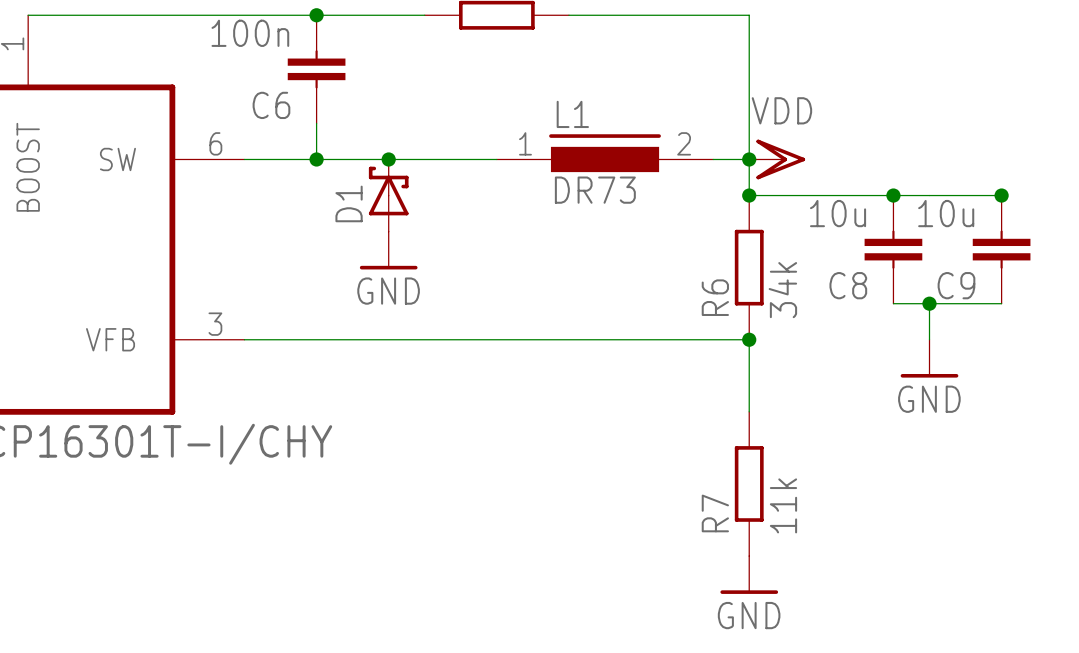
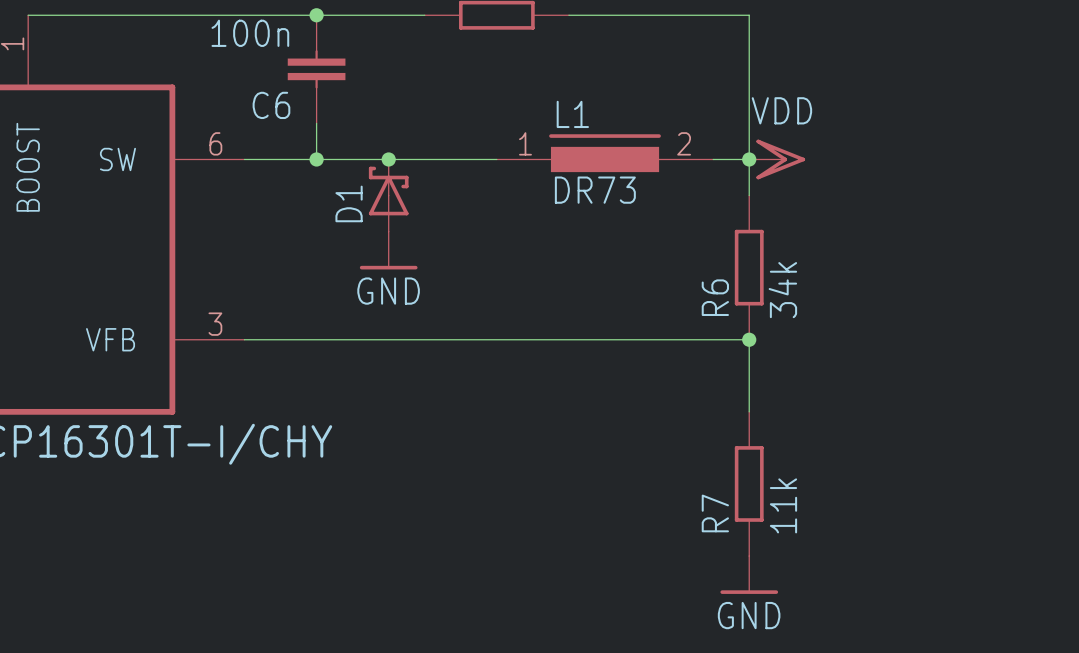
wire: (749, 195) (1001, 195) -> none
junction: (749, 195) -> none
junction: (893, 195) -> none
junction: (1001, 195) -> none
C8: 10u (893, 249) -> none
C9: 10u (1001, 249) -> none
wire: (893, 303) (1001, 303) -> none
wire: (929, 303) (929, 339) -> none
junction: (929, 303) -> none
power symbol: GND (929, 358) -> none

